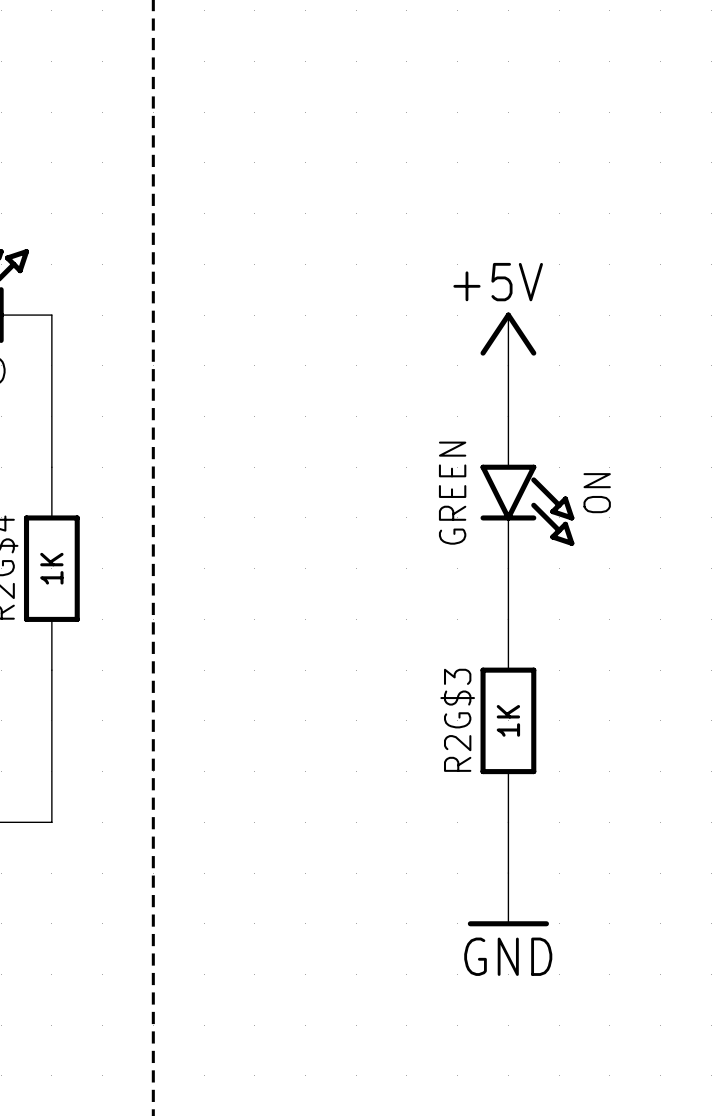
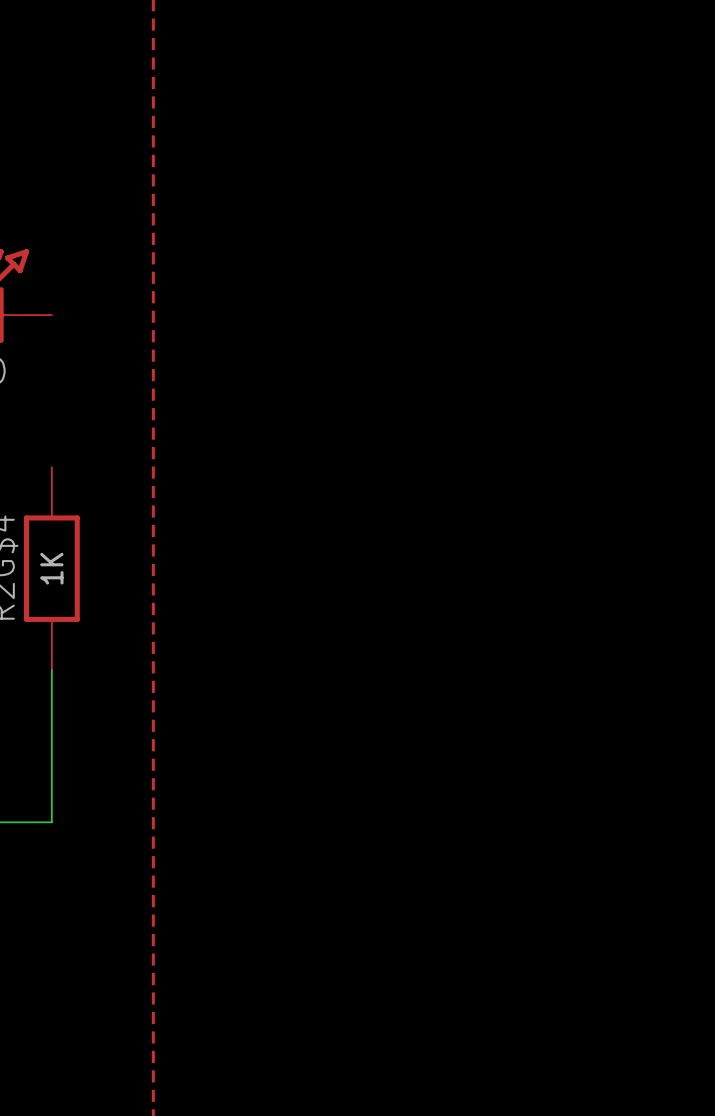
wire: (51, 315) (51, 467) -> none
power symbol: +5V (508, 339) -> none
wire: (508, 365) (508, 416) -> none
ON: GREEN (527, 492) -> none
wire: (508, 568) (508, 619) -> none
R2G$3: 1K (508, 720) -> none
wire: (508, 822) (508, 873) -> none
power symbol: GND (508, 899) -> none

